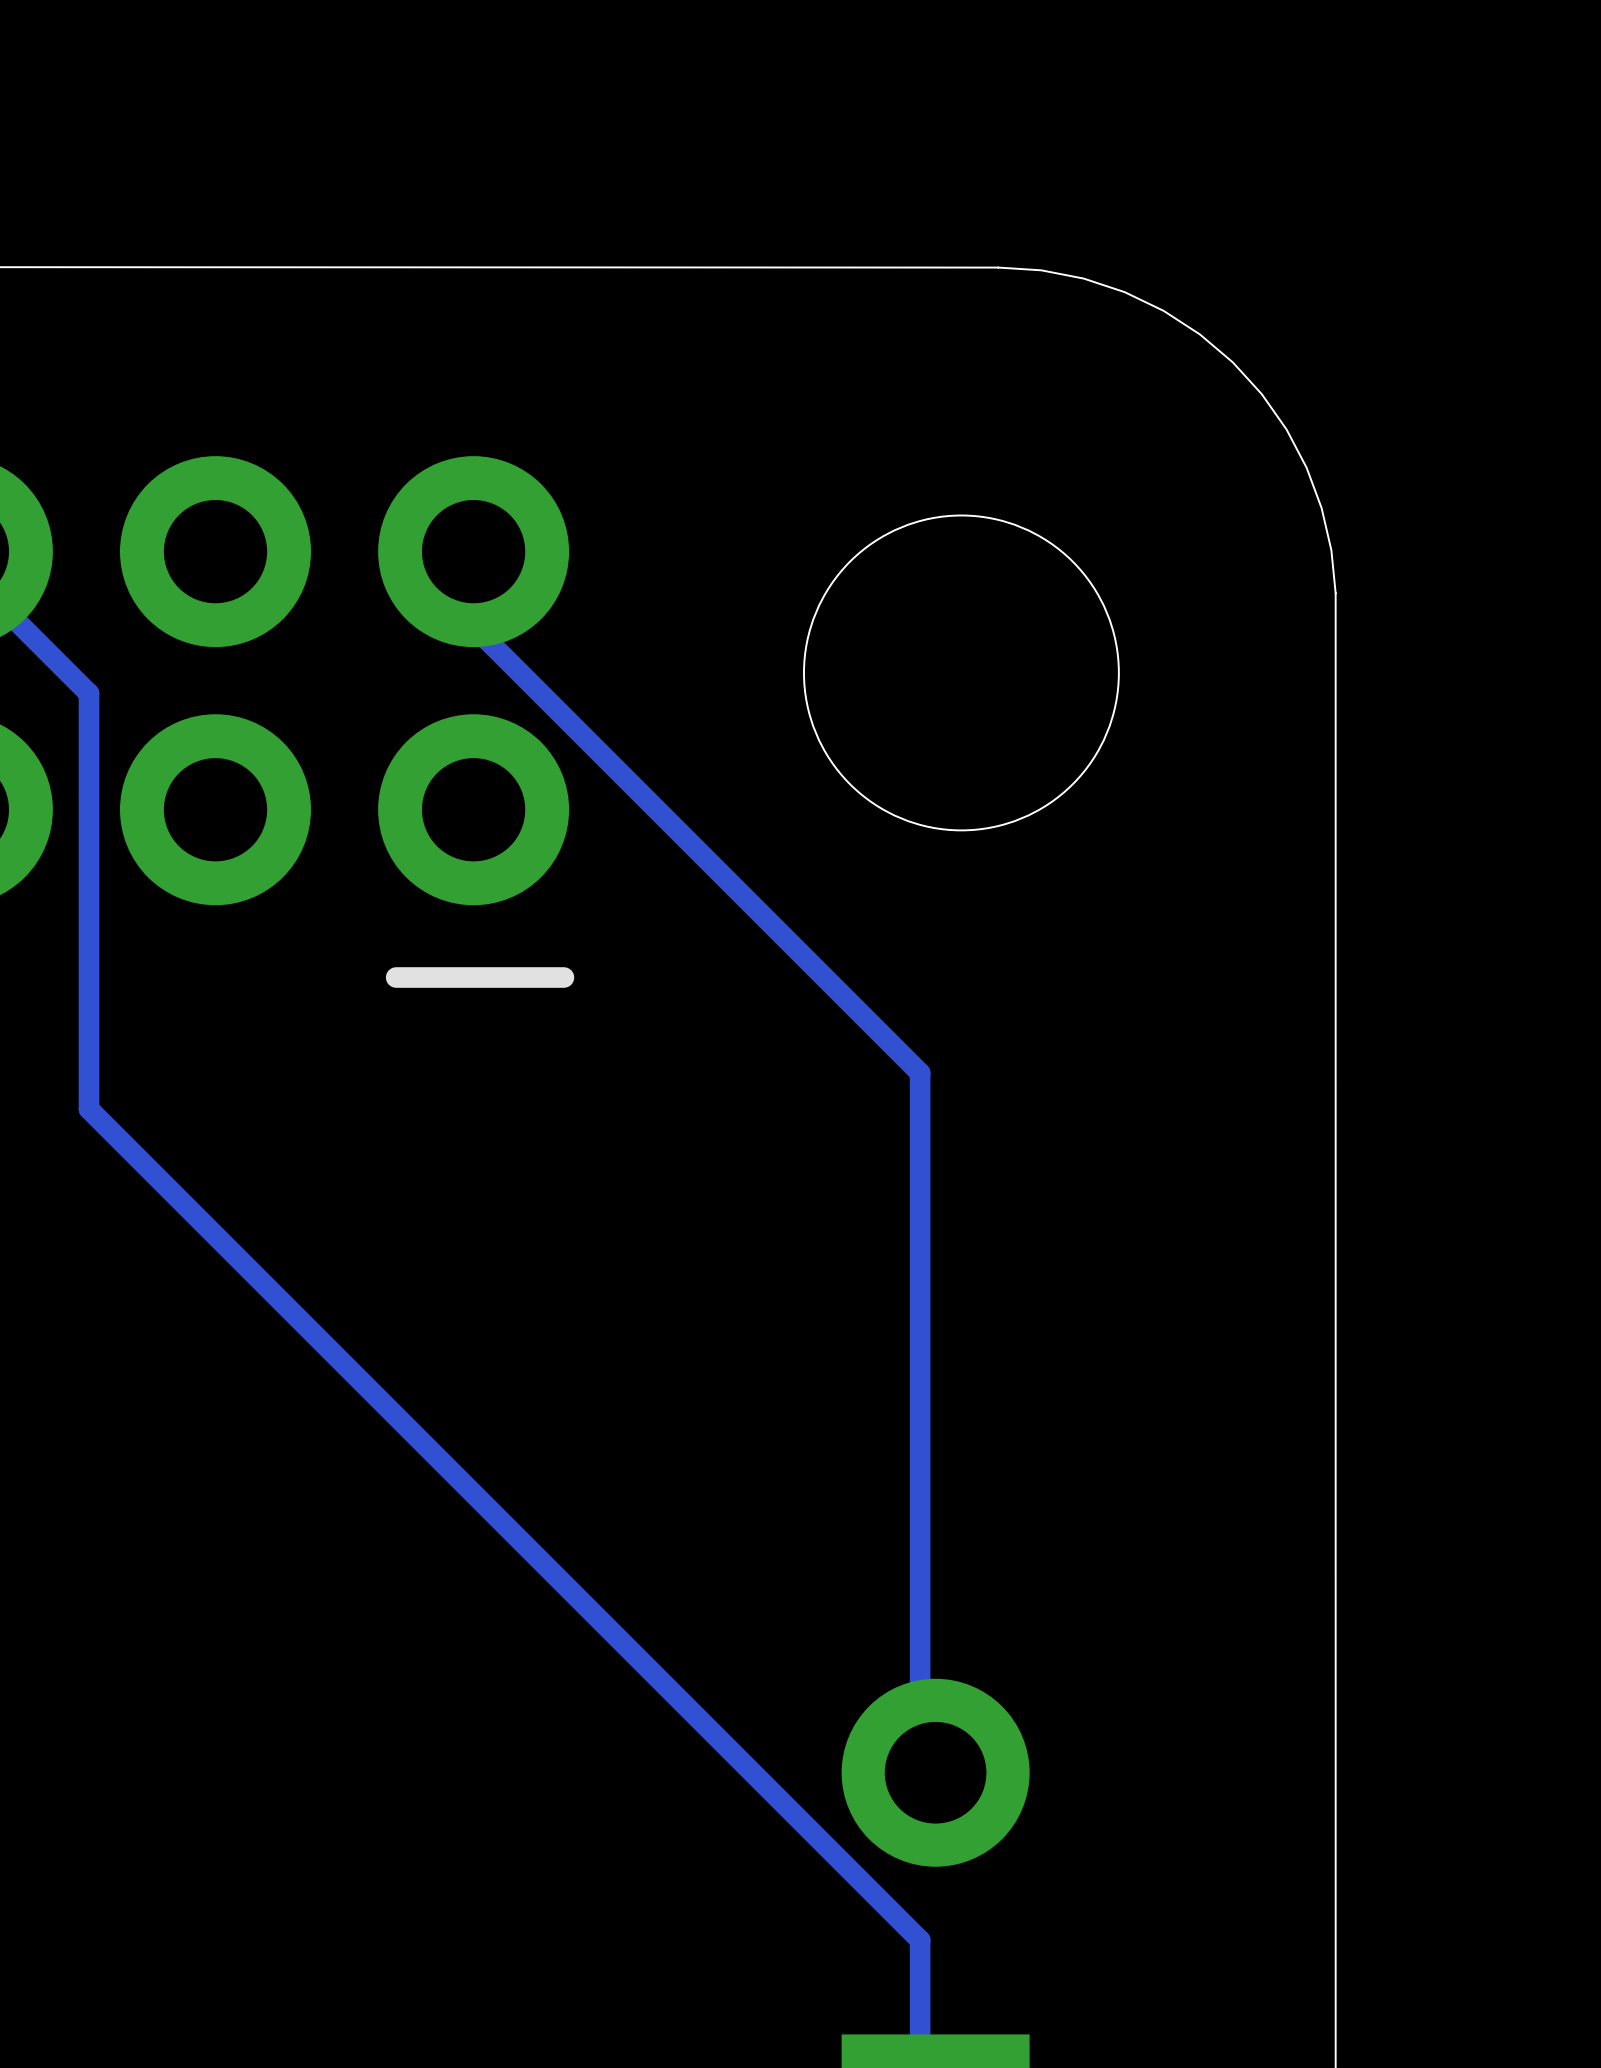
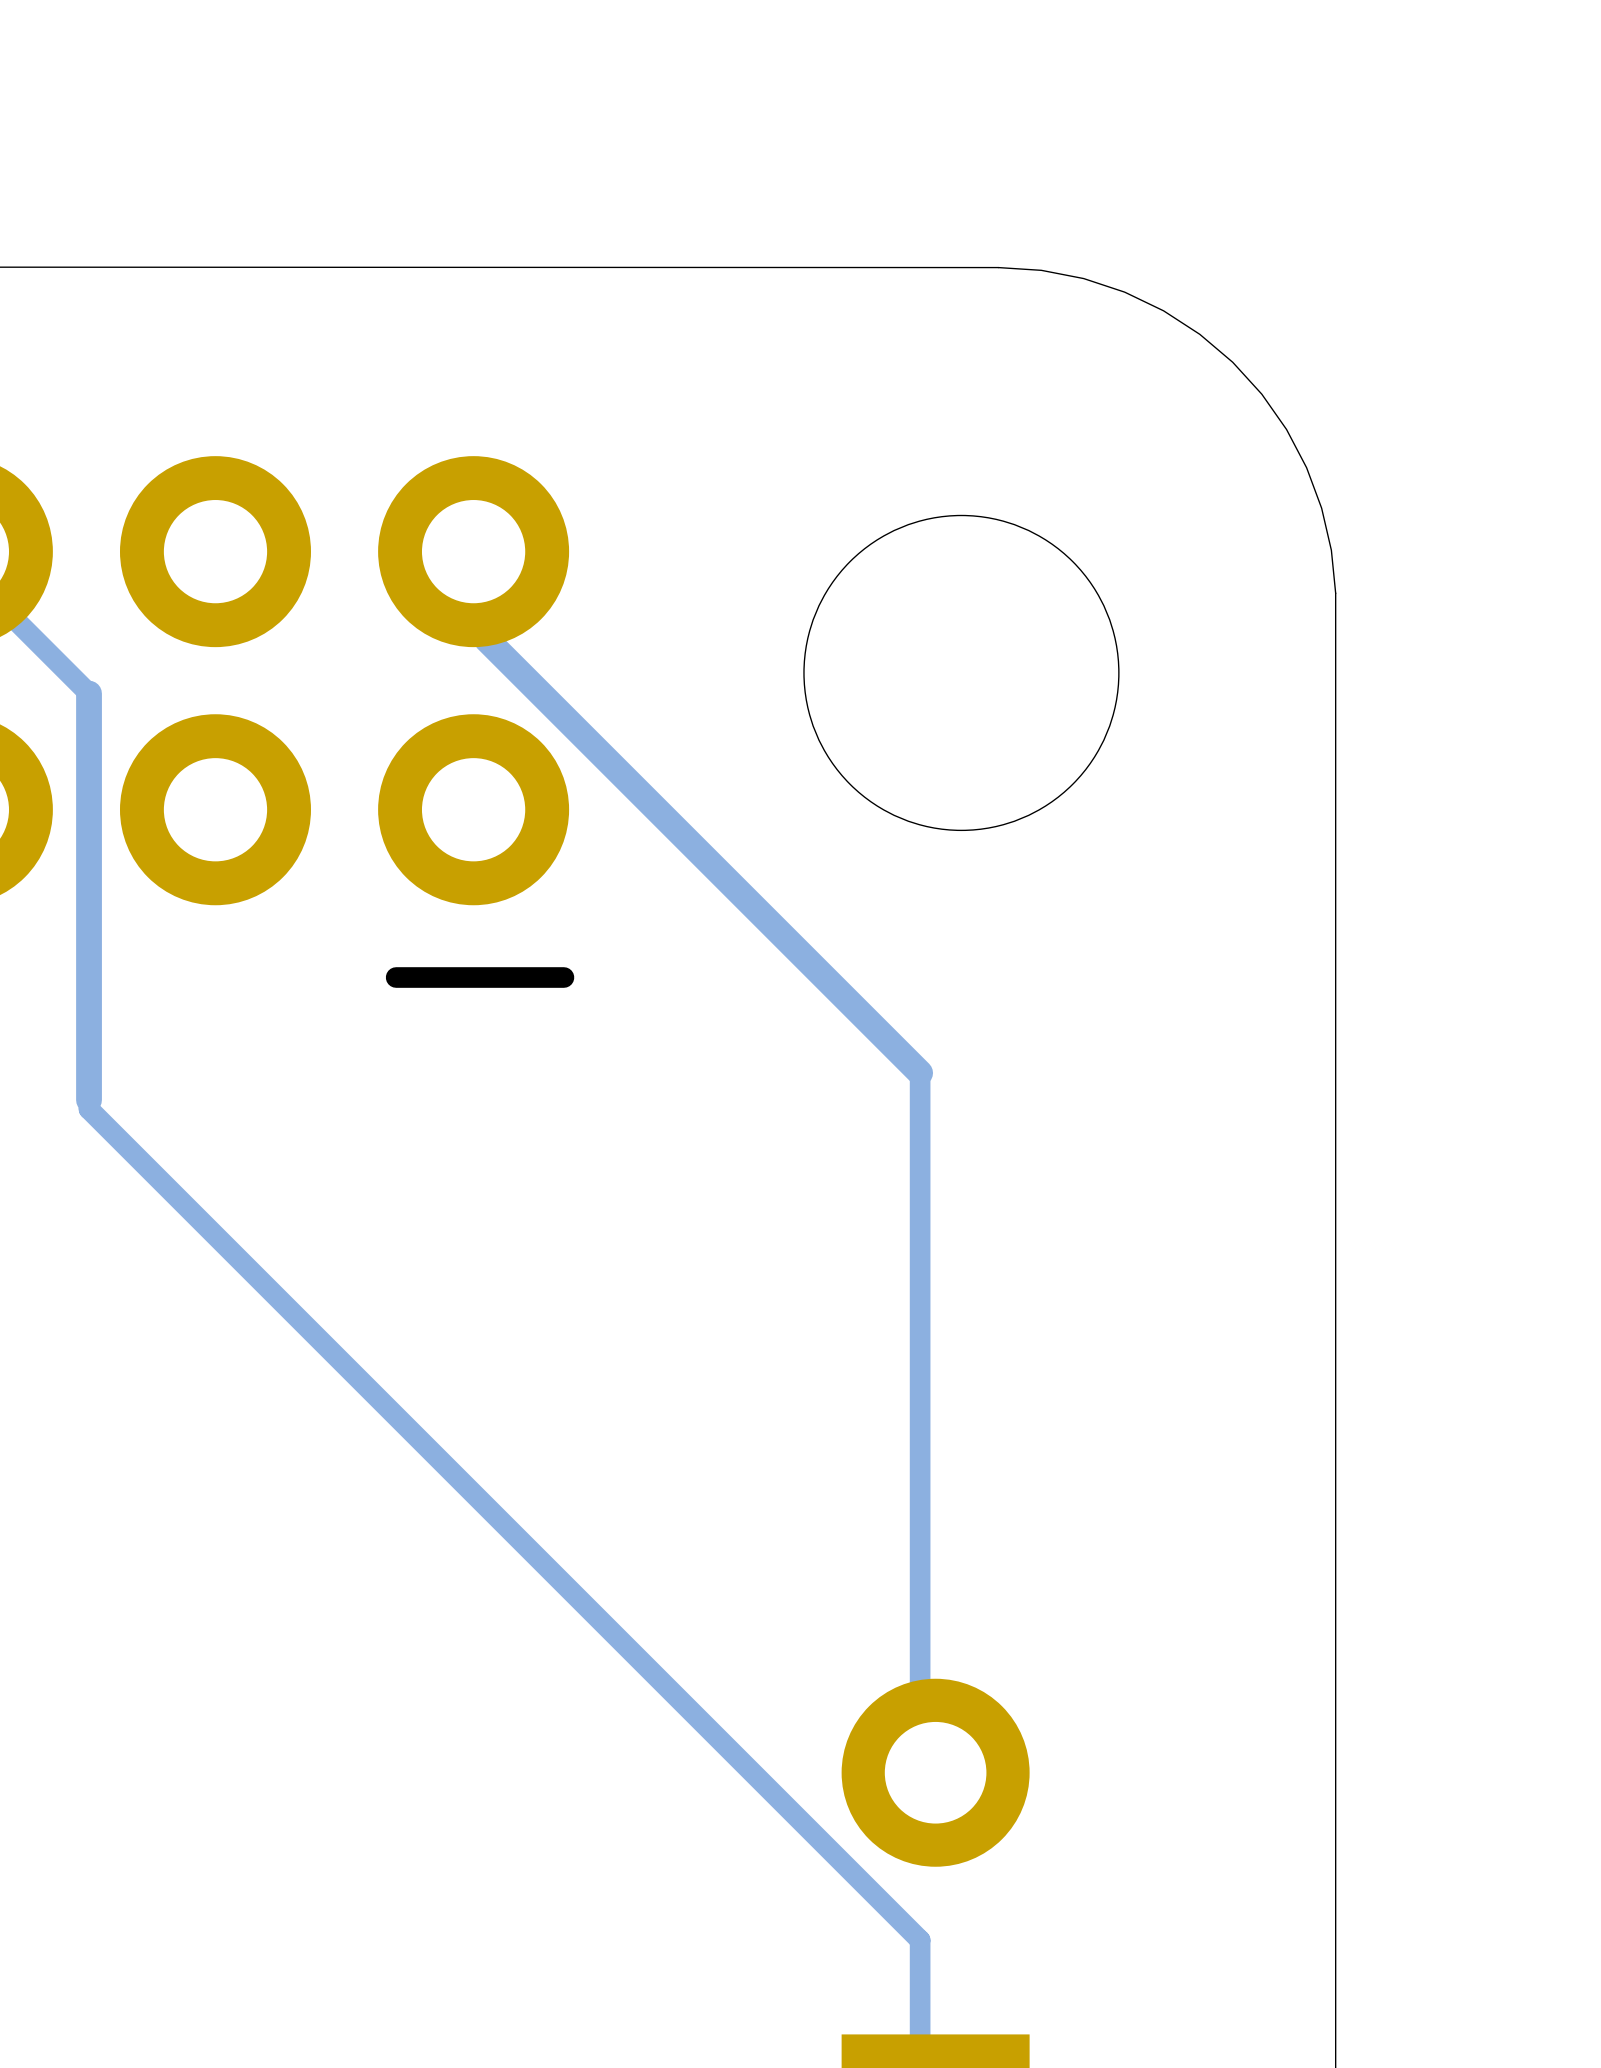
track width: thin (486, 639) (920, 1073) -> thick (486, 639) (920, 1073)
track width: thin (89, 693) (89, 1100) -> thick (89, 693) (89, 1100)

